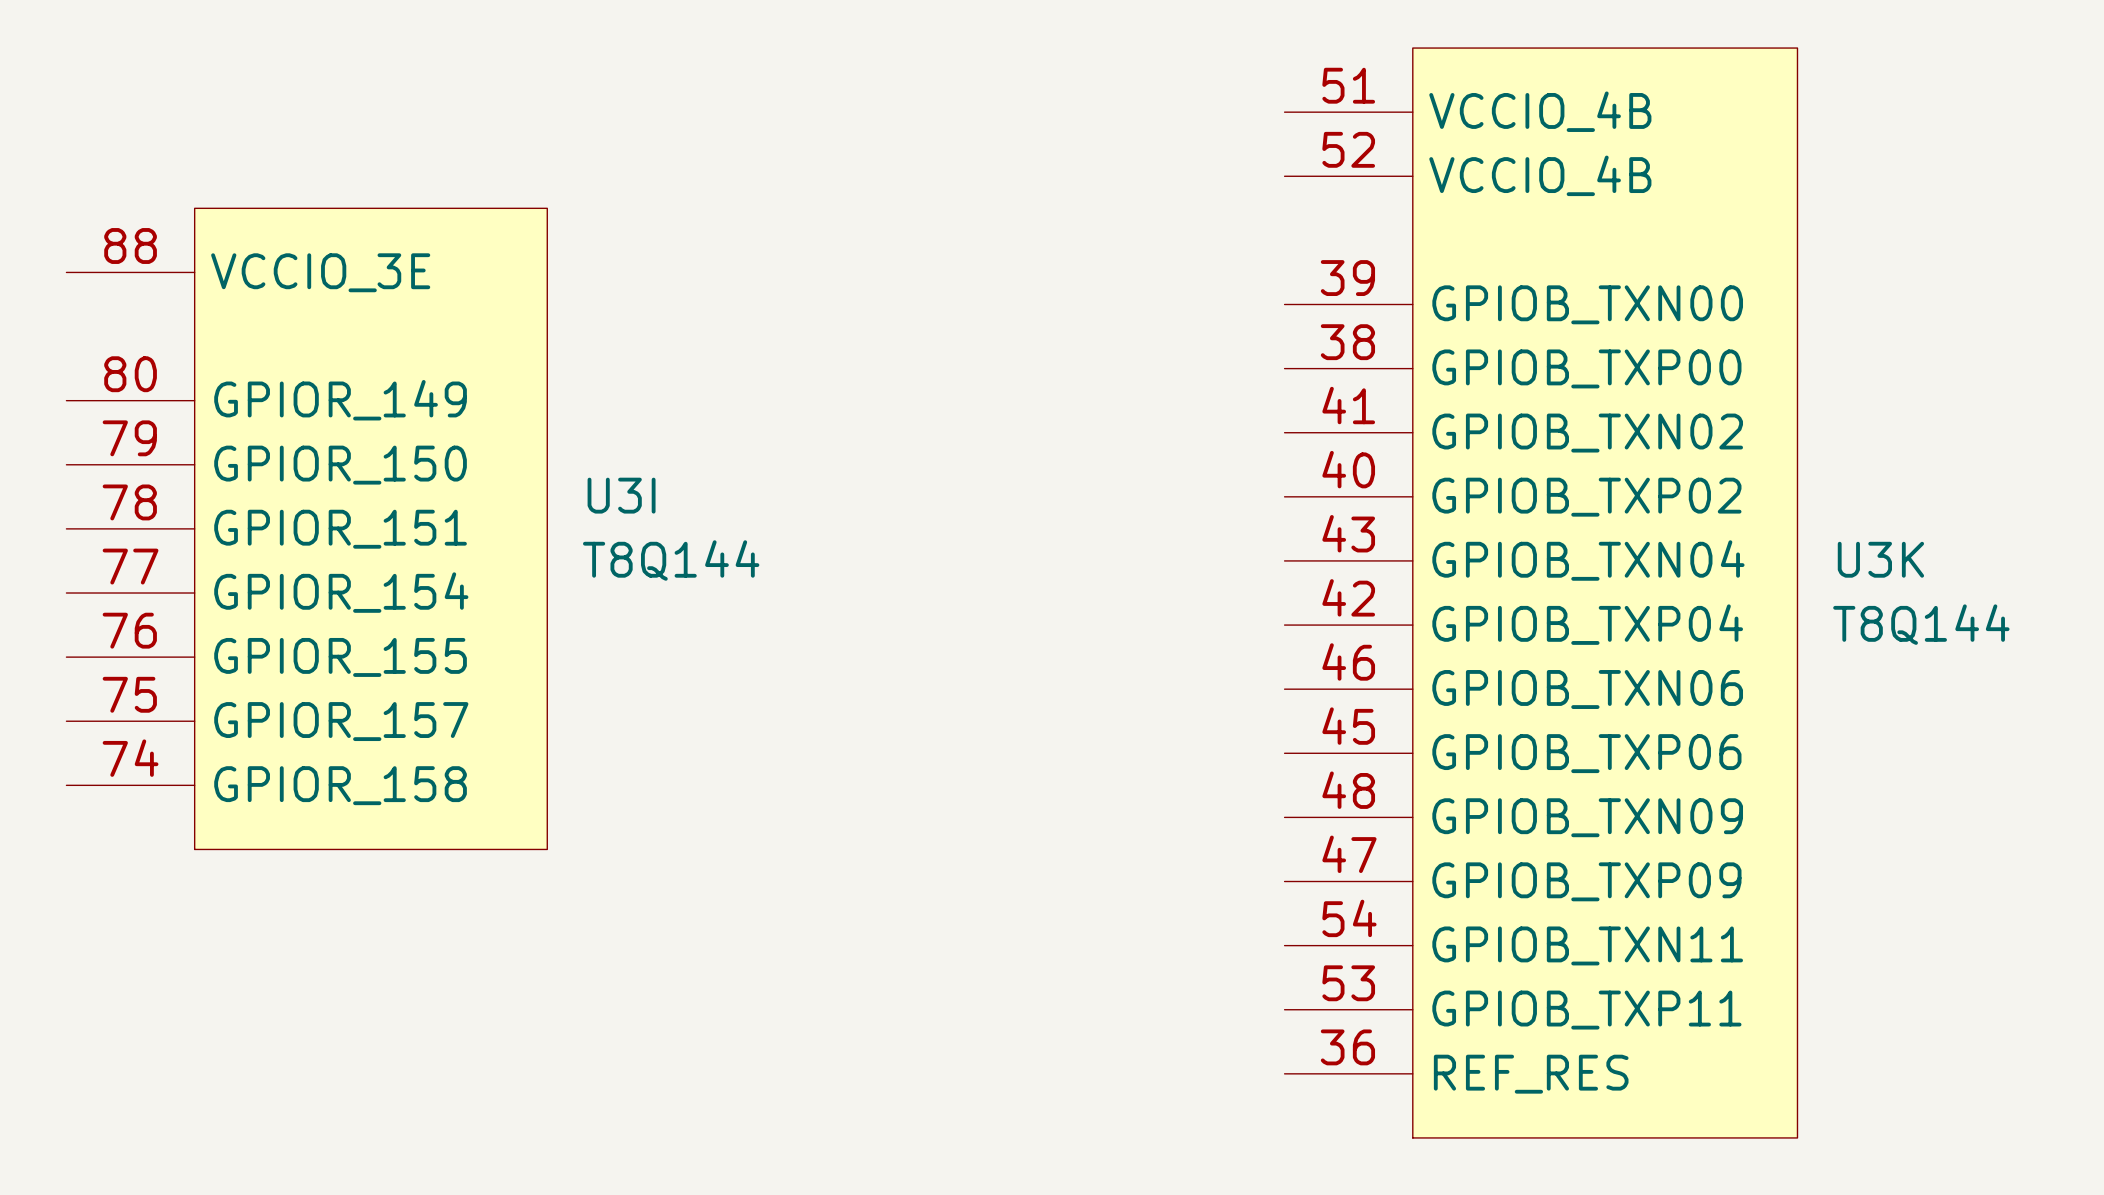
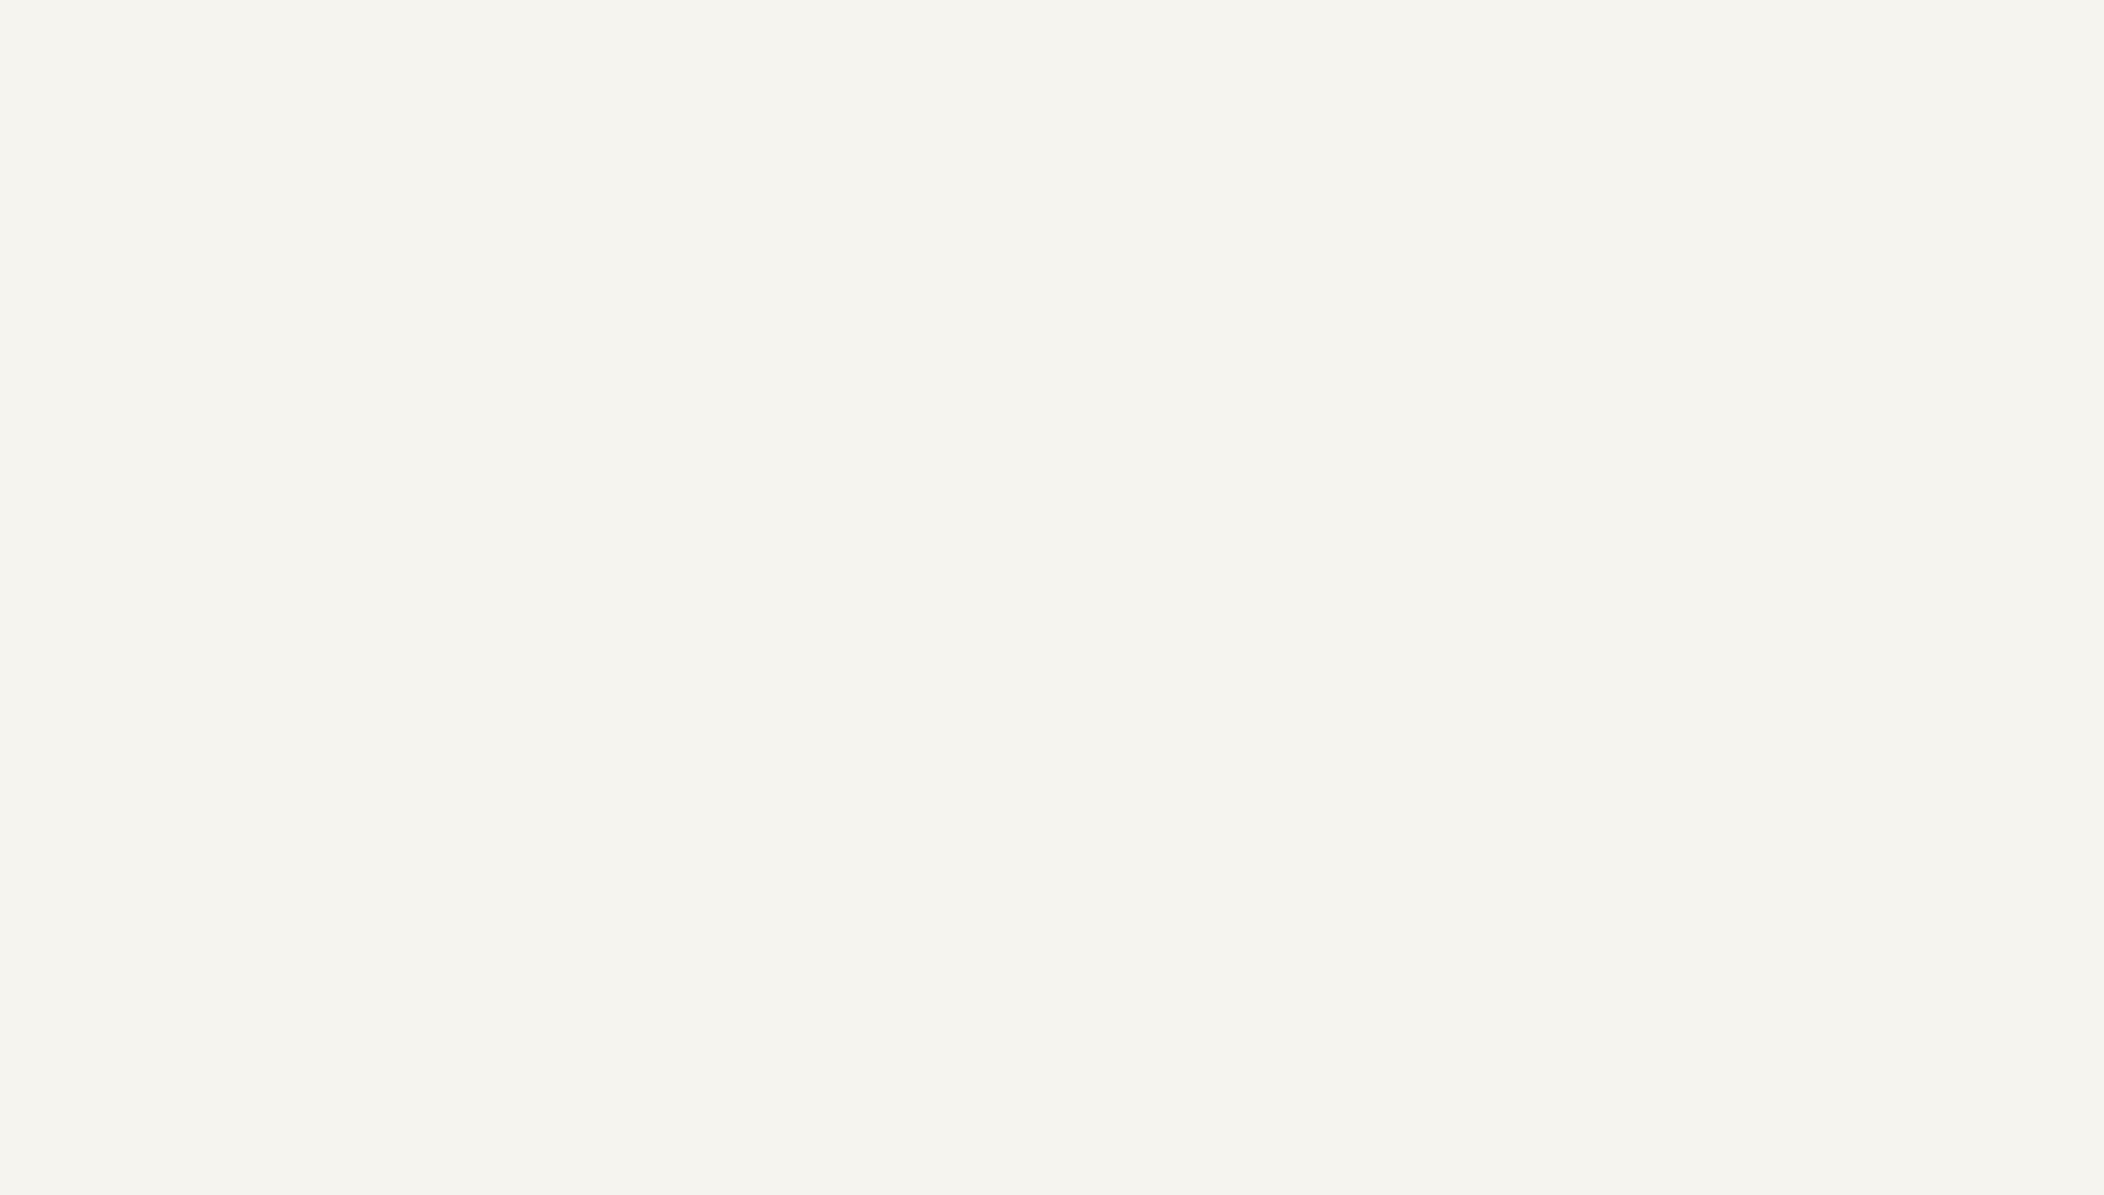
U3I: T8Q144 (306, 528) -> none
U3K: T8Q144 (1541, 593) -> none

